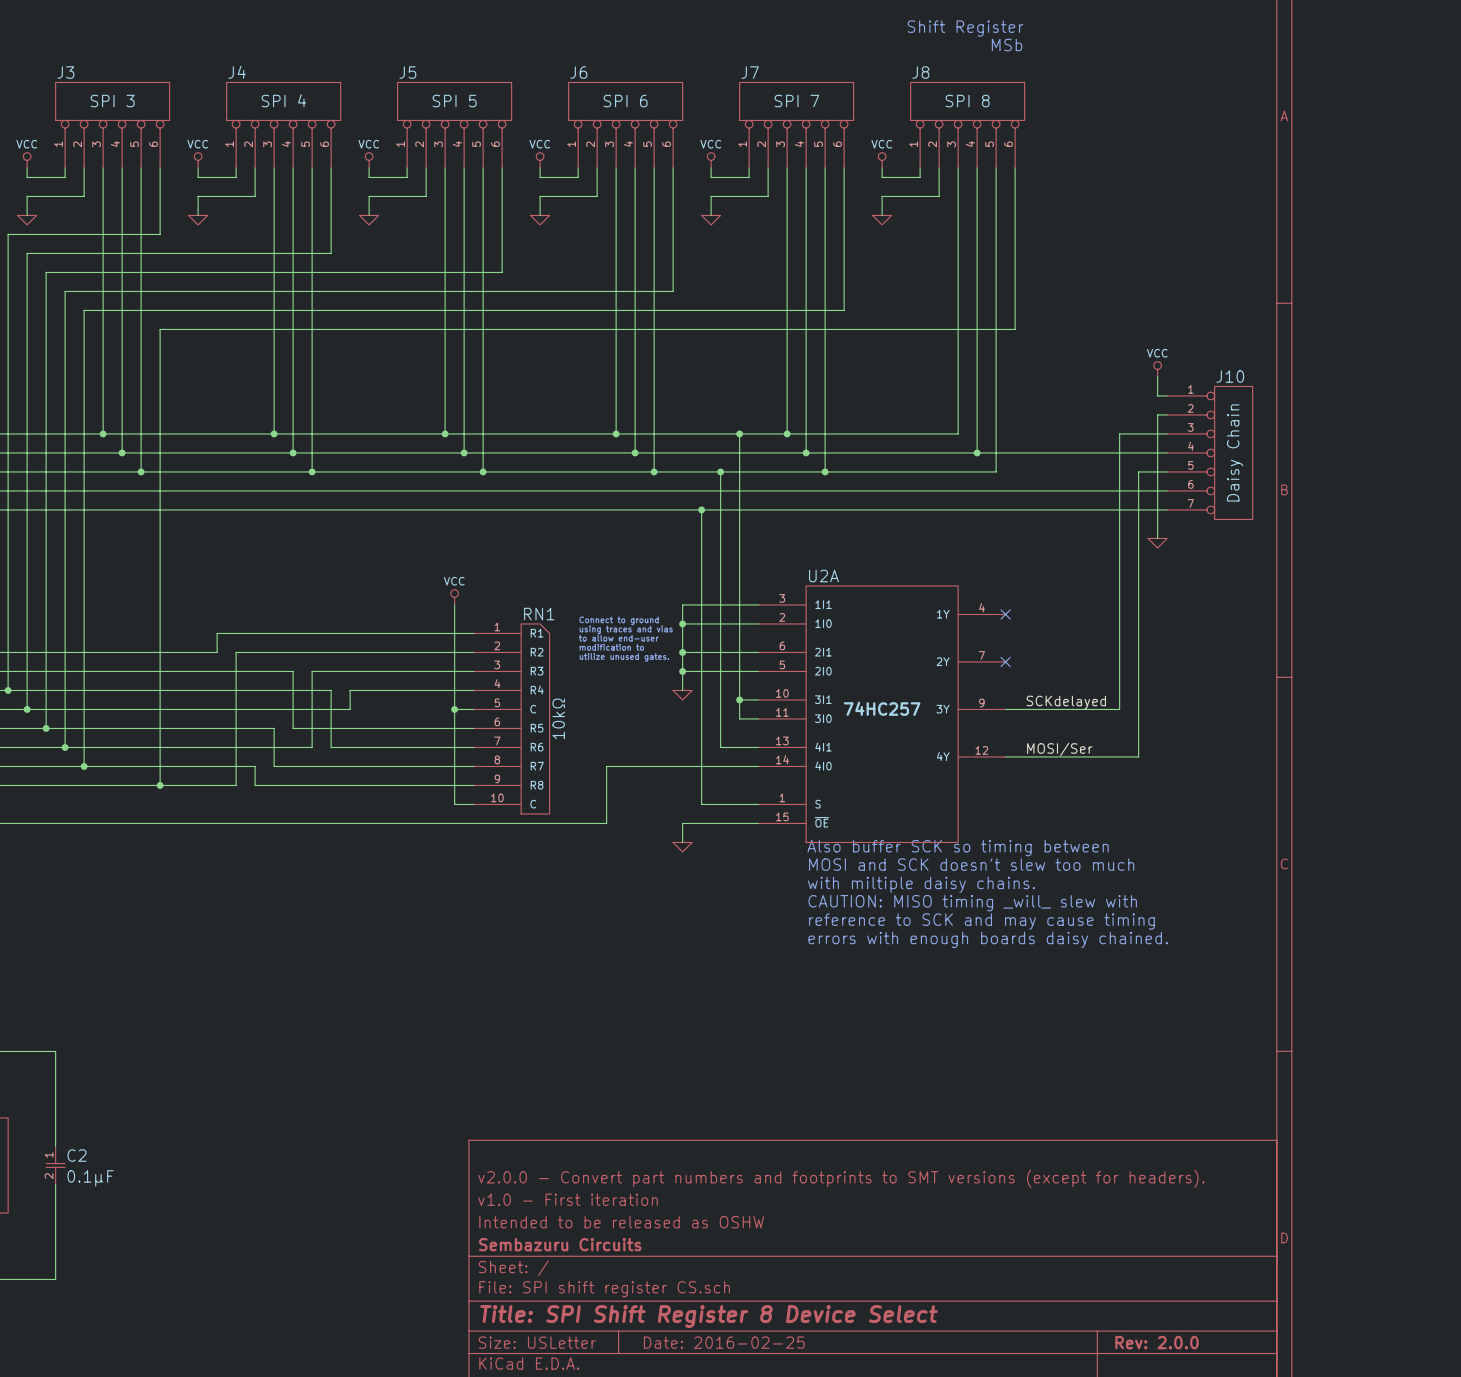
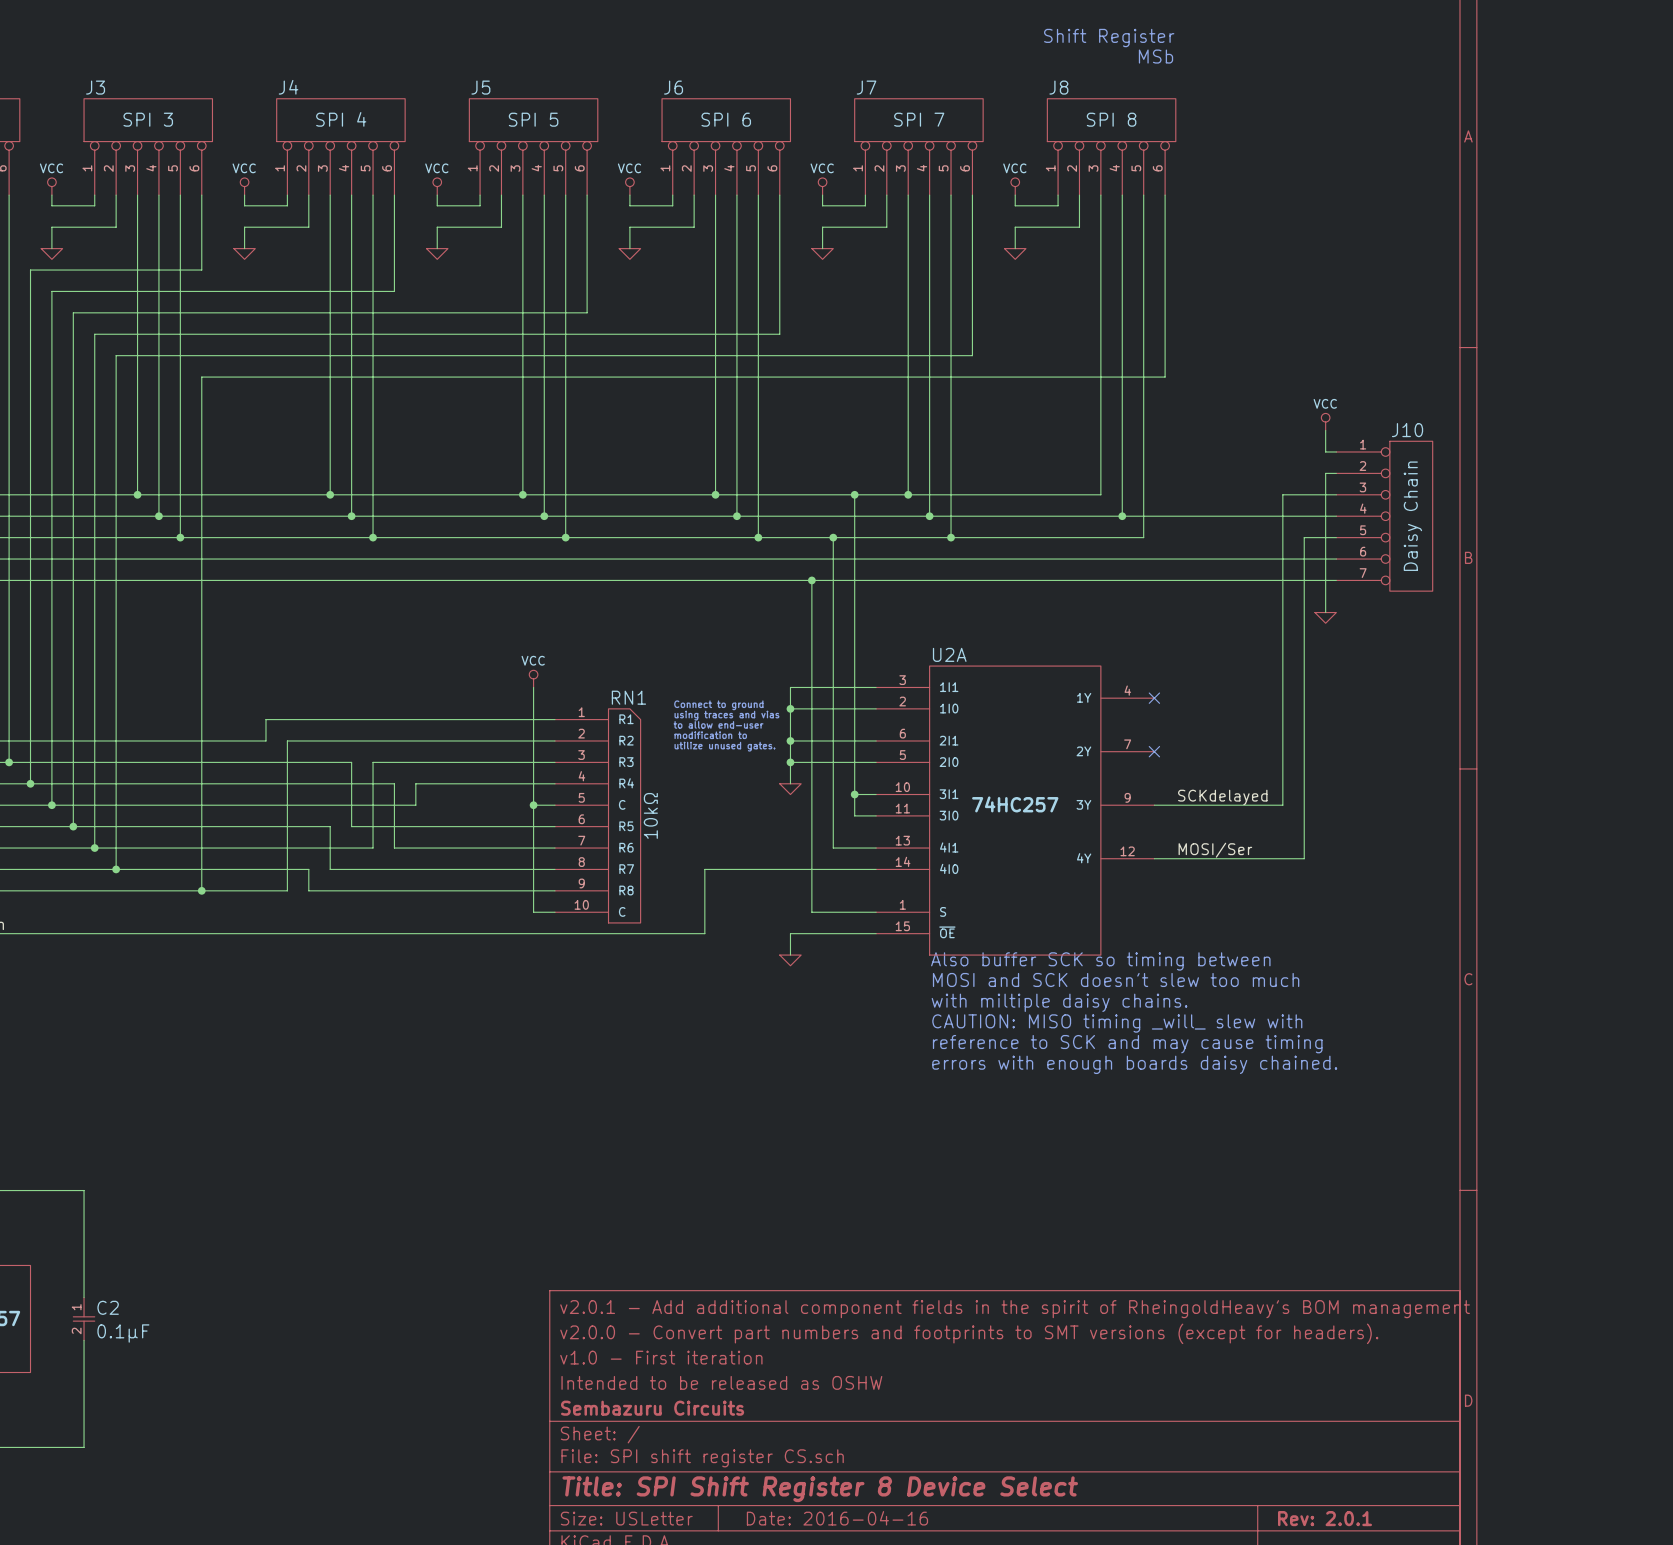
title block: none -> v2.0.1 - Add additional component fields in the spirit of RheingoldHeavy's BOM management (1015, 1309)
title block: Date: 2016-02-25 (724, 1342) -> Date: 2016-04-16 (837, 1518)
title block: Rev: 2.0.0 (1157, 1342) -> Rev: 2.0.1 (1325, 1518)

